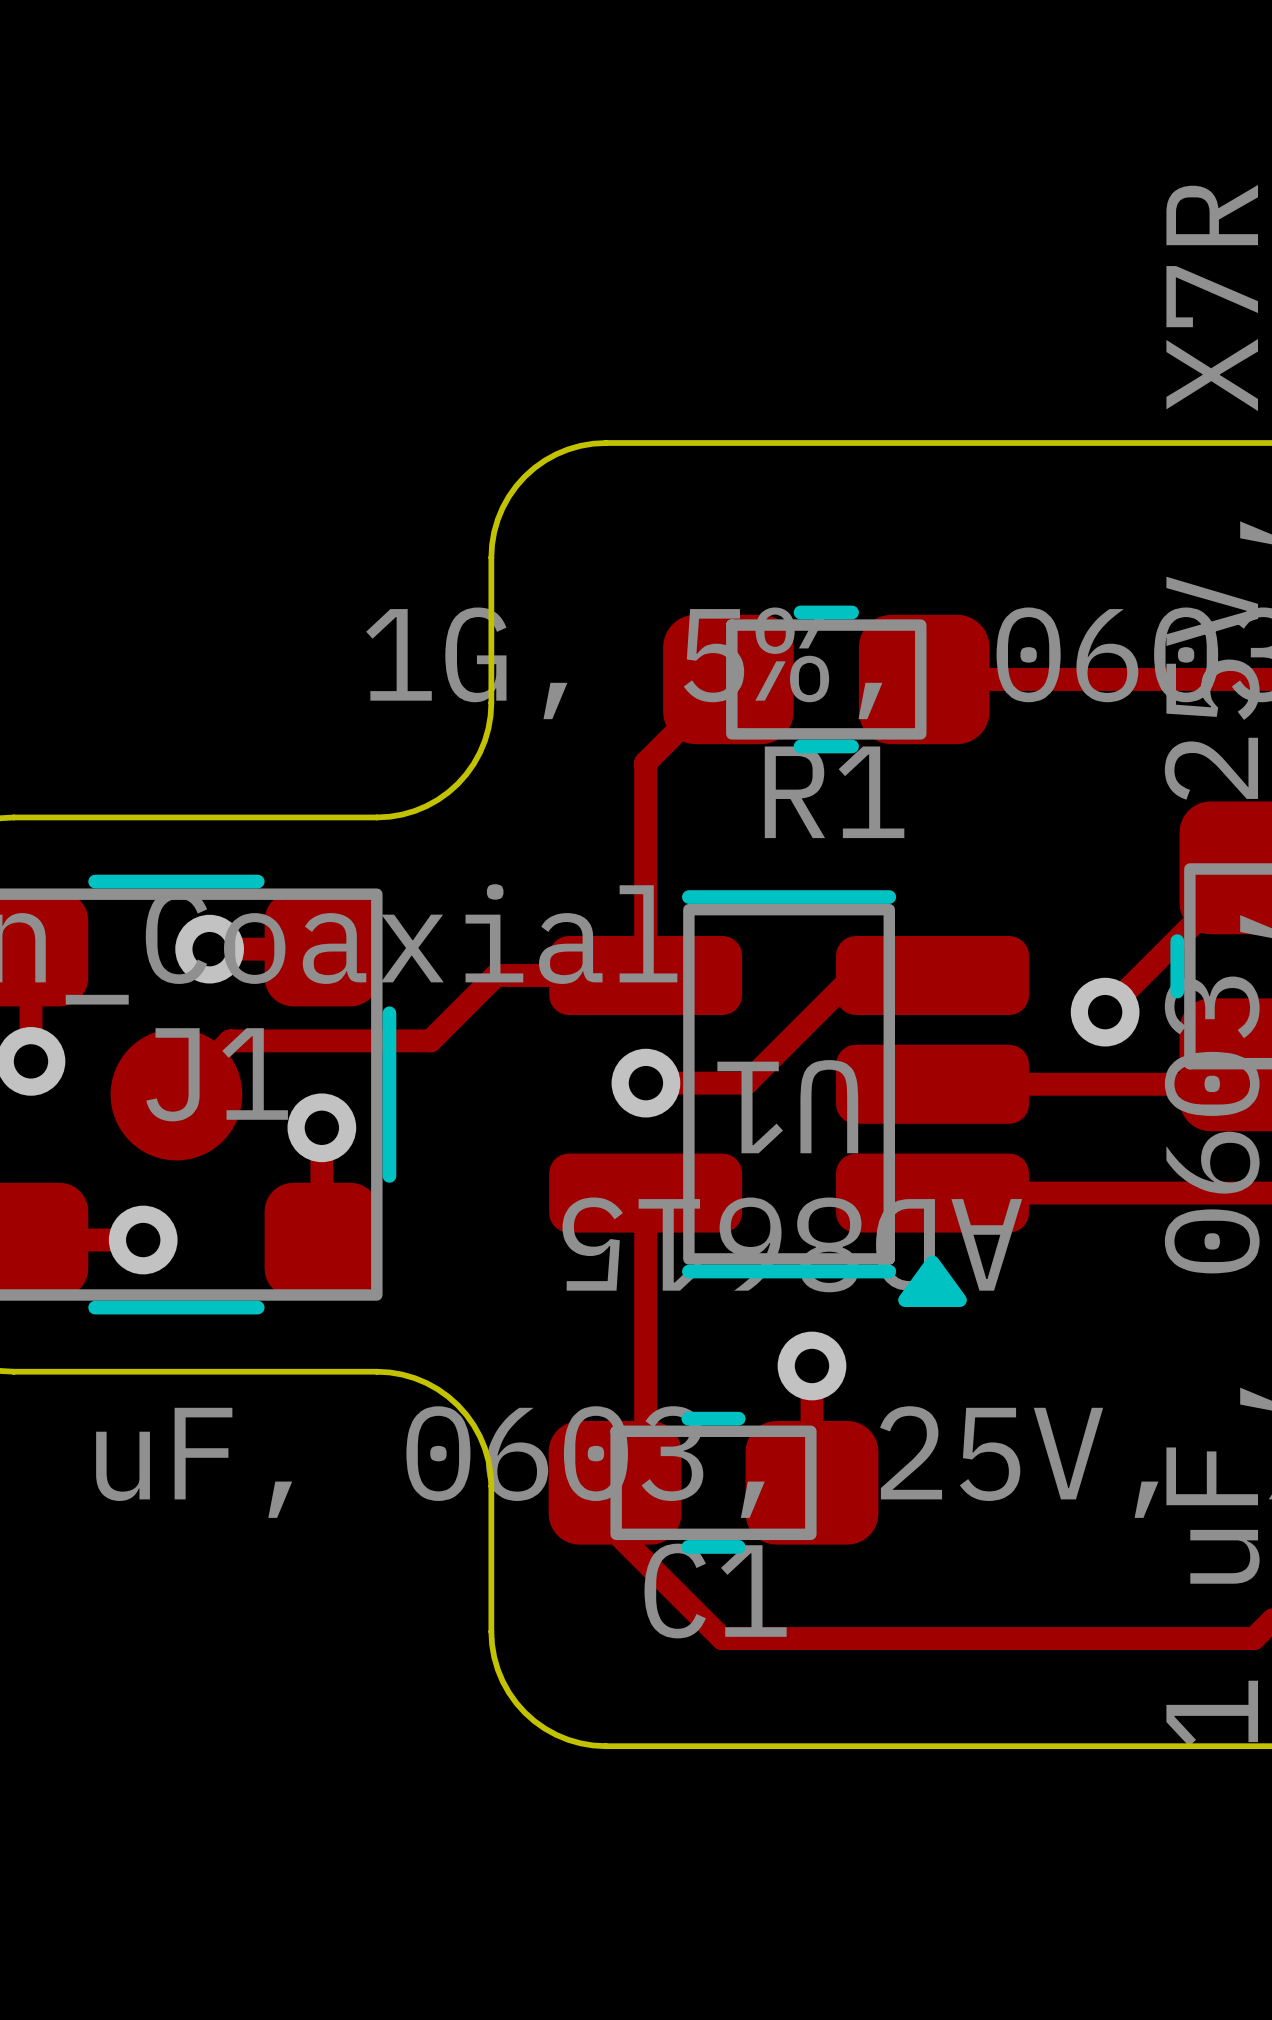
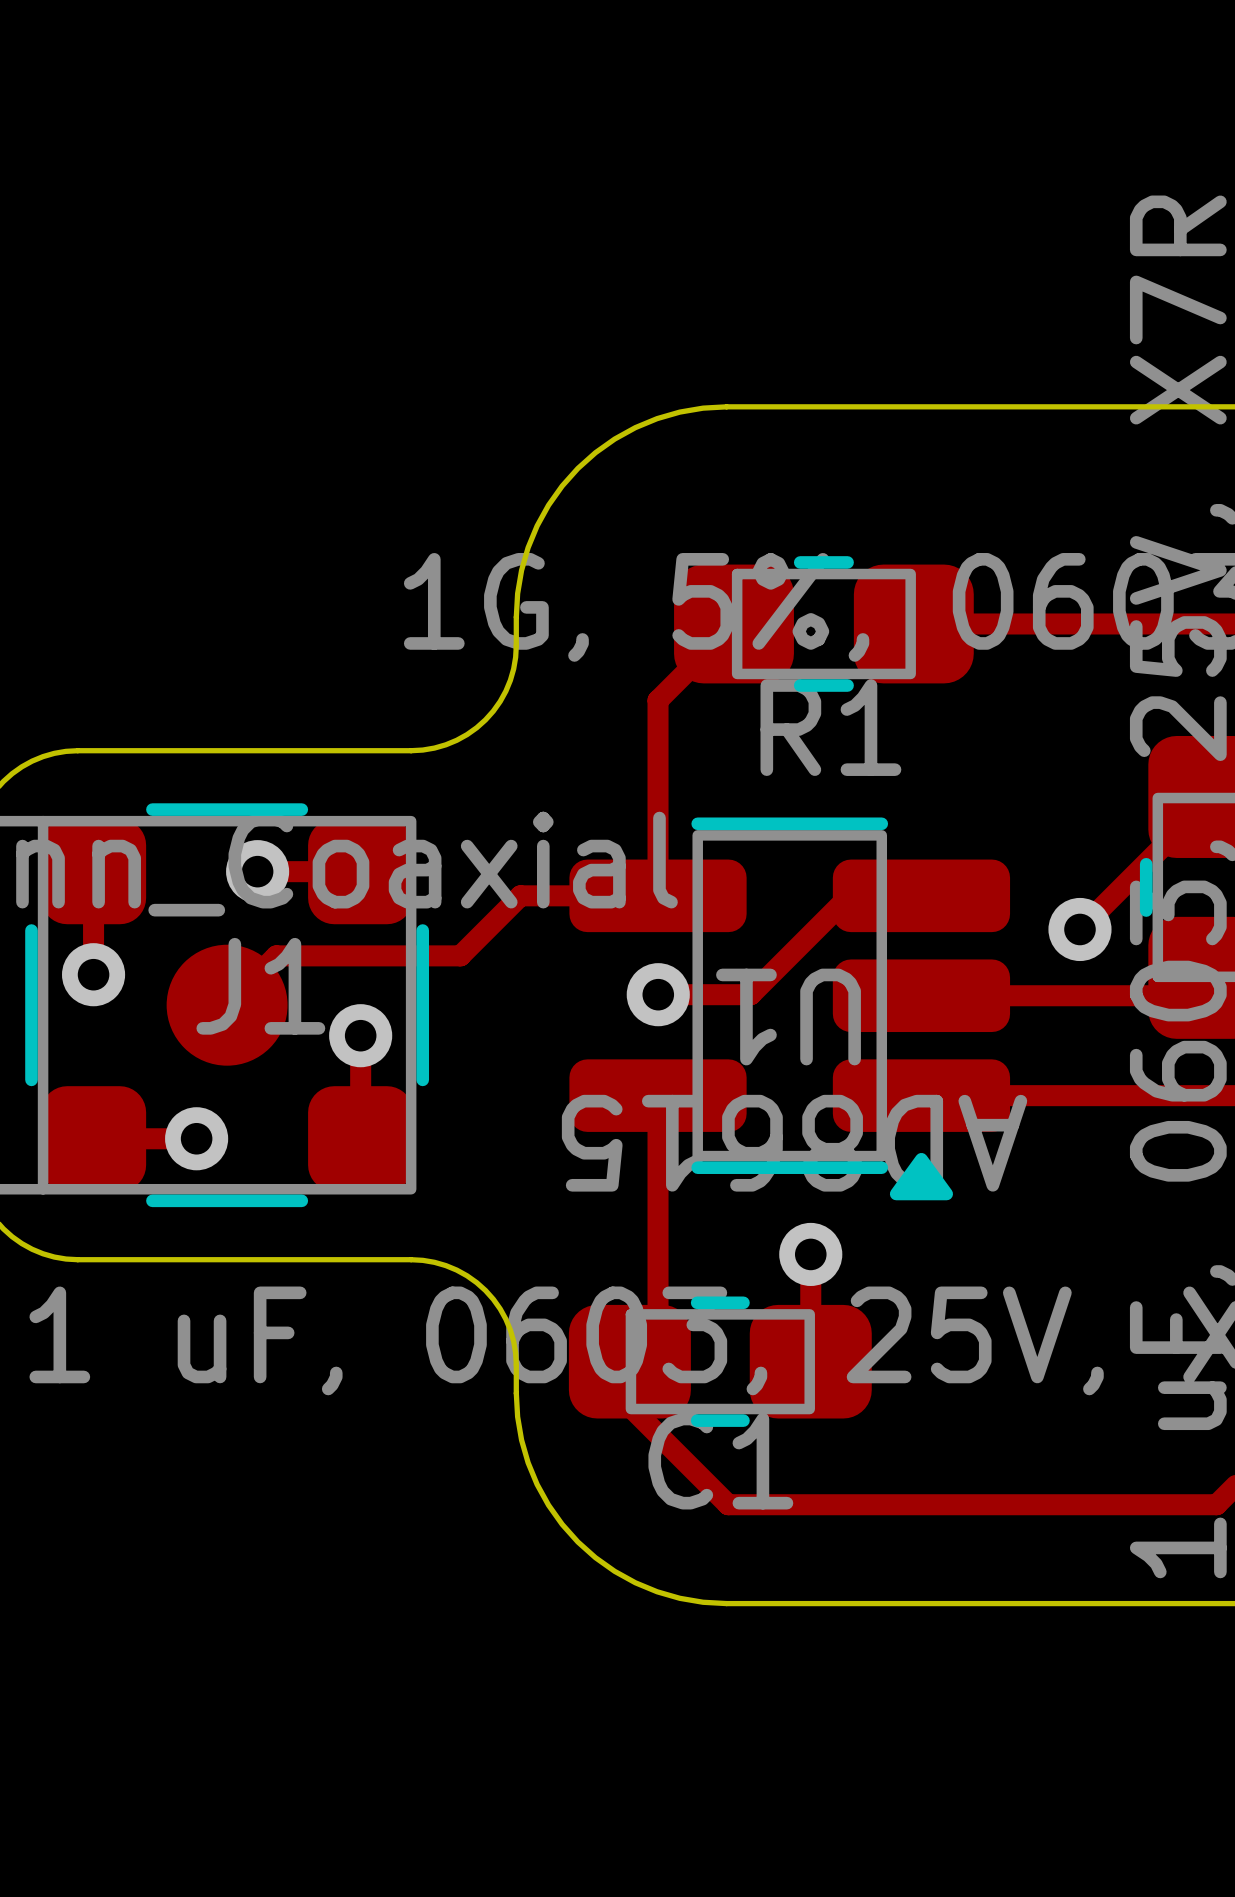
board edge: (720, 443) (605, 443) (580, 445) (544, 460) (524, 476) (508, 496) (494, 532) (491, 557) (491, 672) -> (726, 406) (679, 412) (635, 427) (614, 439) (577, 468) (548, 505) (528, 547) (517, 593) (516, 617)
board edge: (491, 1517) (491, 1631) (494, 1657) (502, 1681) (524, 1712) (544, 1728) (580, 1743) (605, 1746) (720, 1746) -> (516, 1393) (521, 1440) (537, 1484) (548, 1505) (577, 1541) (614, 1571) (635, 1582) (679, 1598) (726, 1603)

